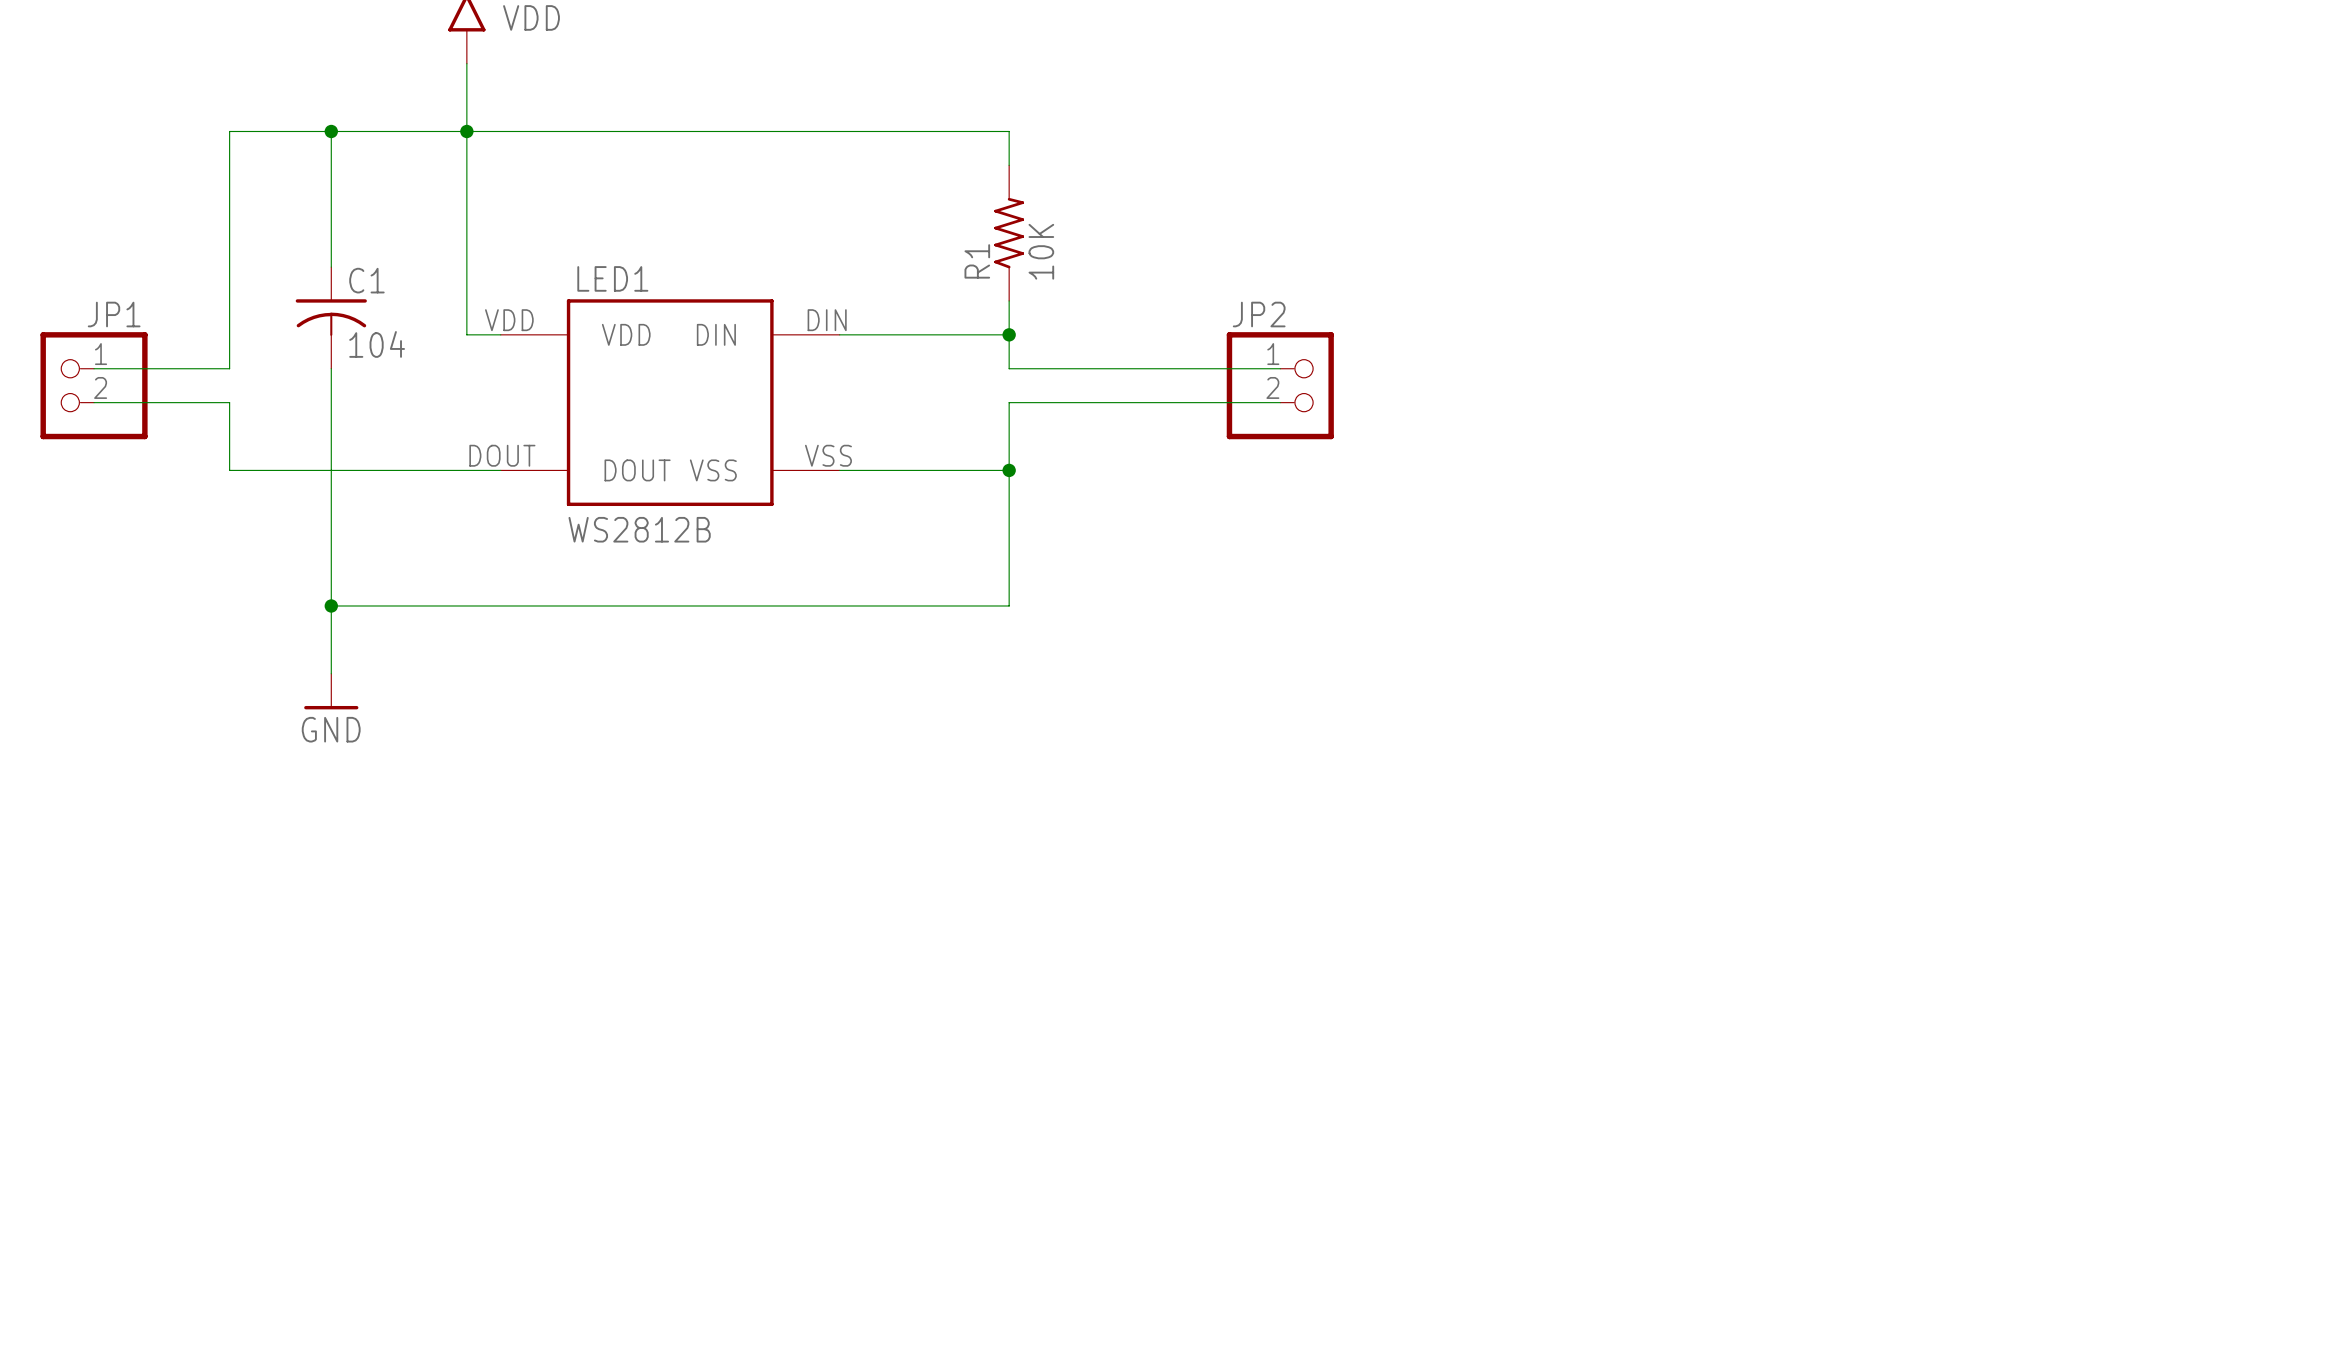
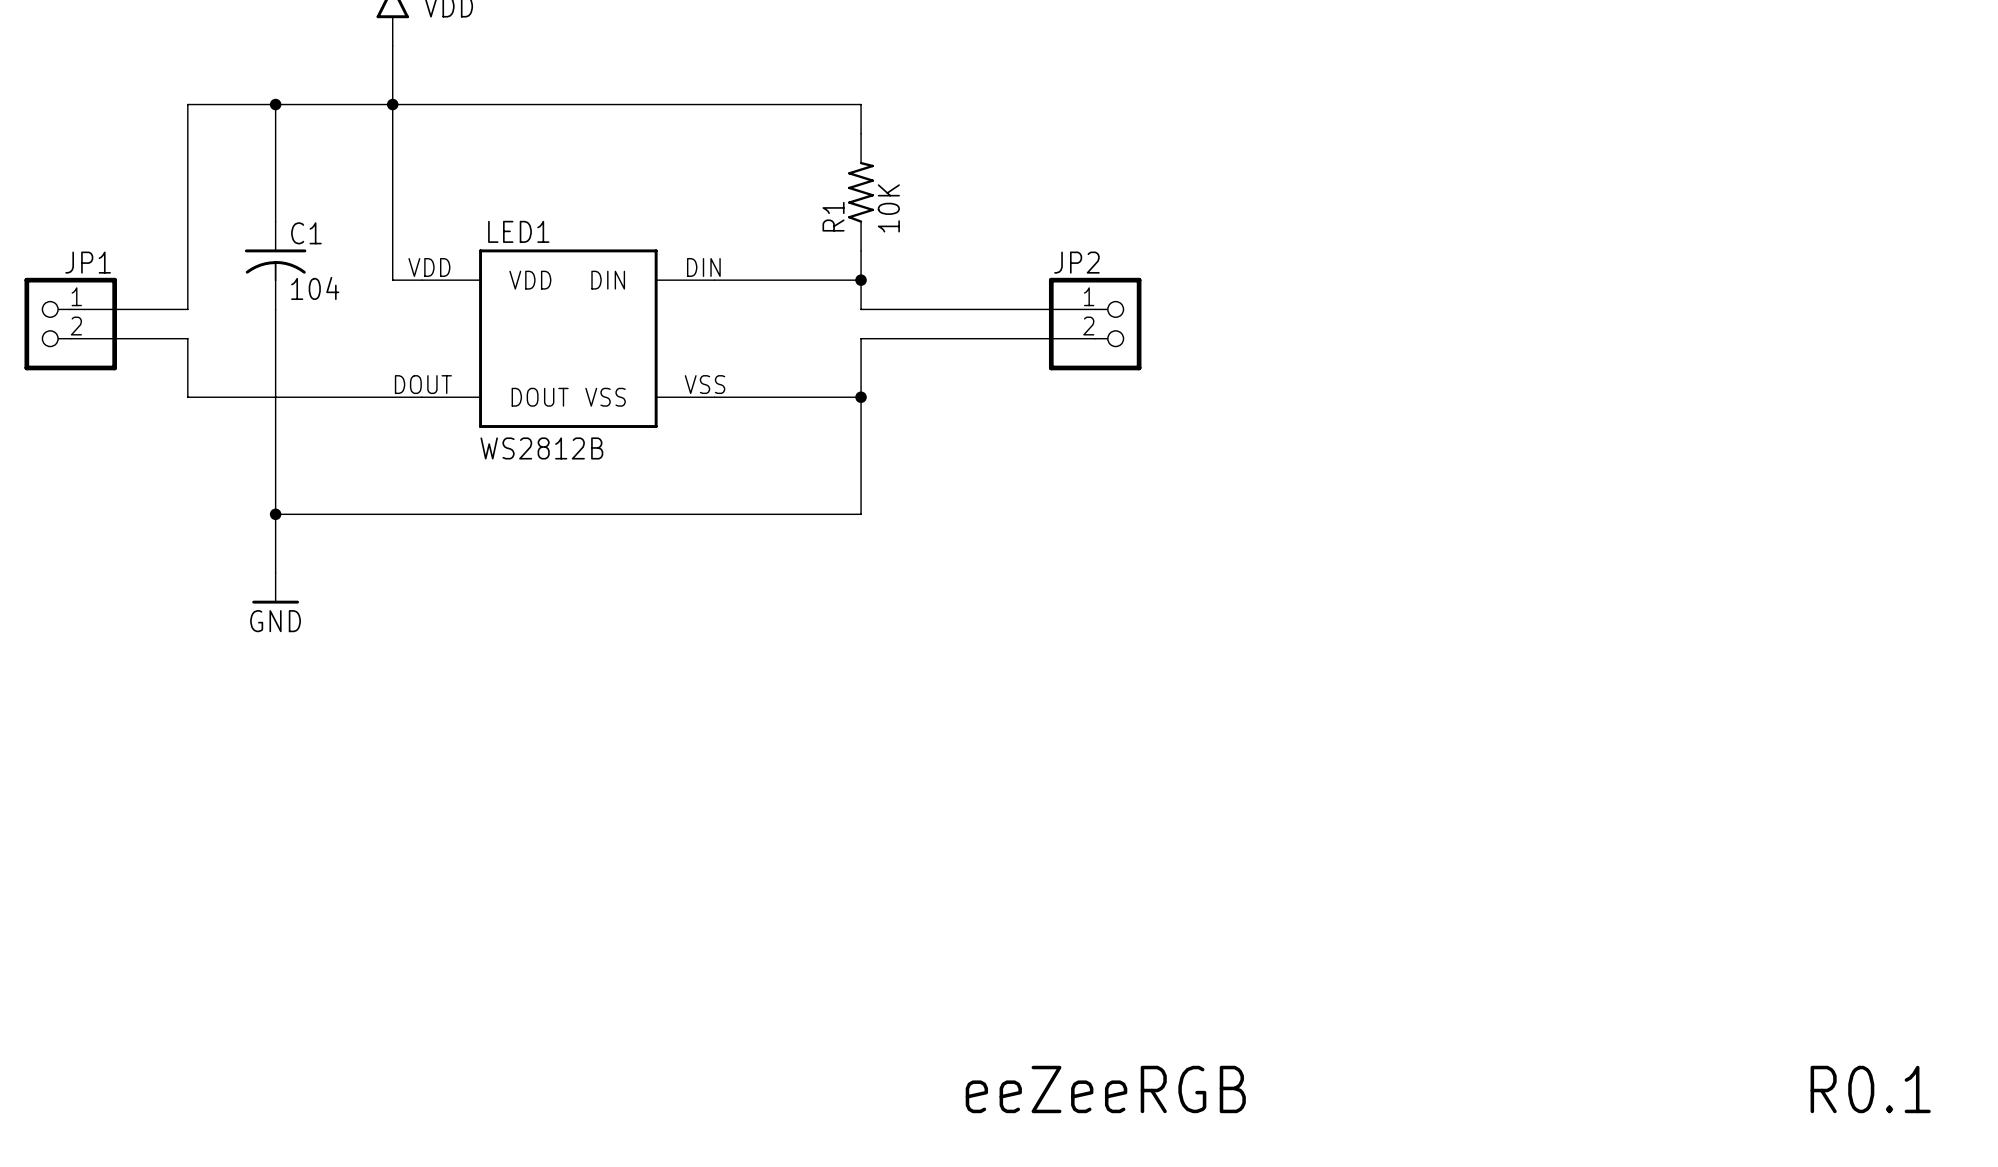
text: none -> eeZeeRGB (1105, 1089)
text: none -> R0.1 (1870, 1089)

